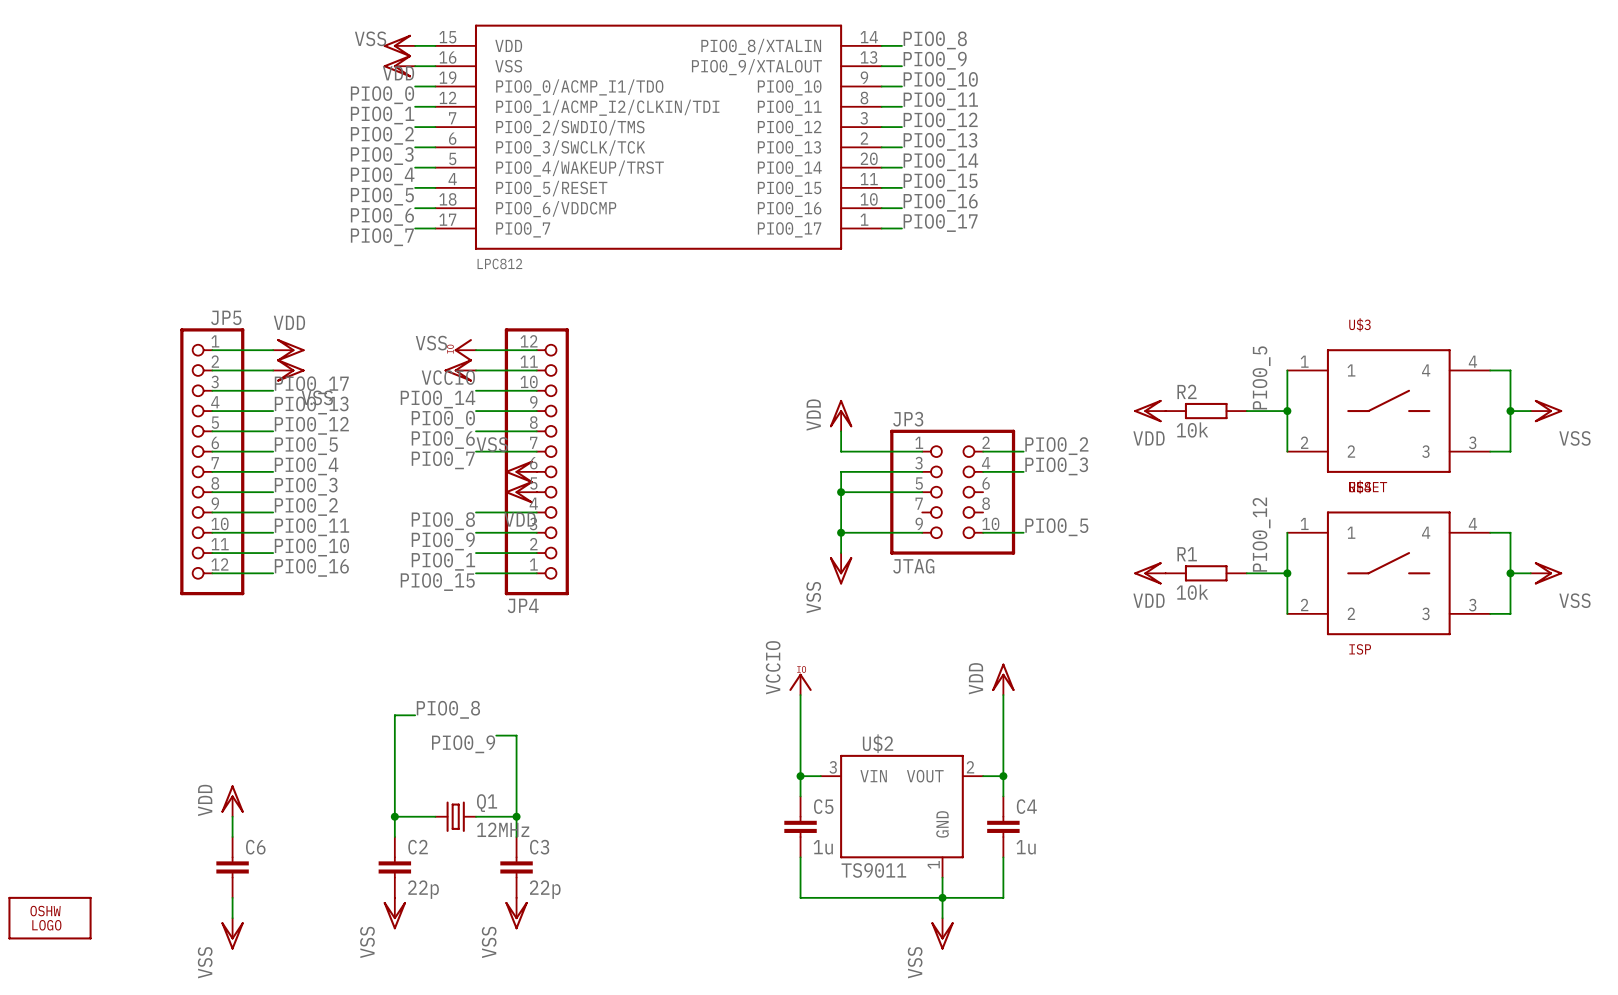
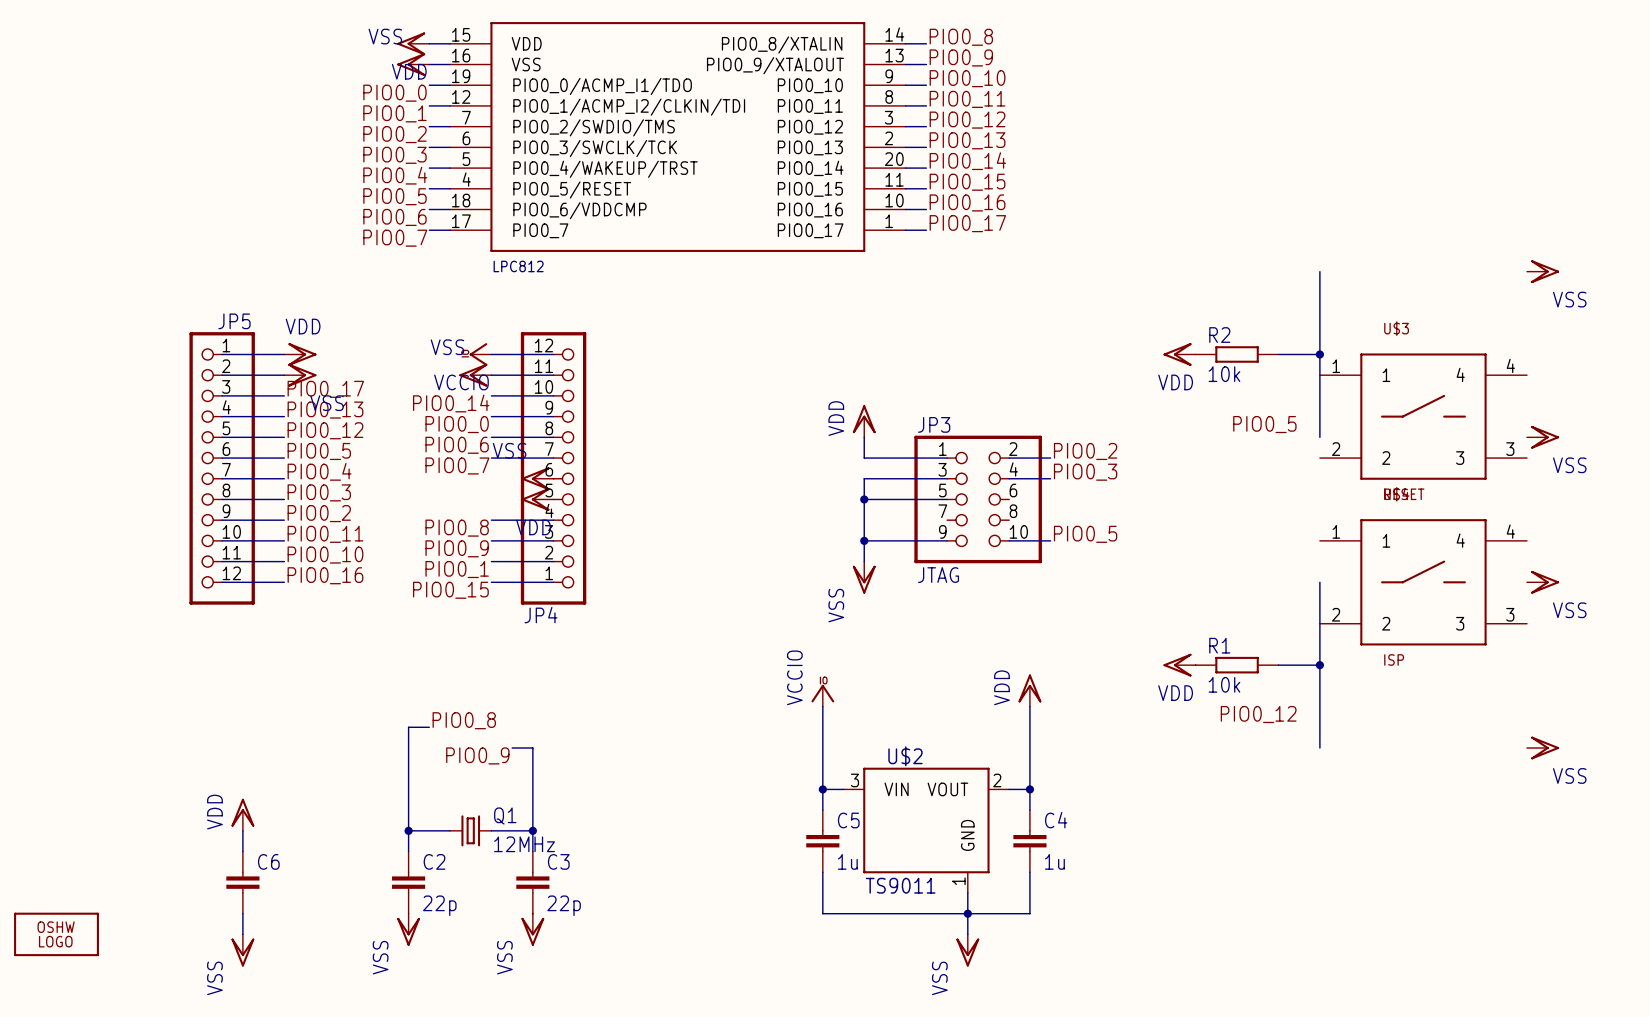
wire: none -> (1319, 271) (1319, 375)
power symbol: none -> VSS (1543, 271)
junction: none -> (1319, 354)
wire: (1490, 370) (1510, 370) (1510, 451) (1490, 451) -> none
label rotation: 0° (1261, 377) -> 90° clockwise (1264, 424)
power symbol position: VDD (1149, 411) -> VDD (1179, 354)
R2 position: (1206, 411) -> (1237, 354)
wire: (1246, 411) (1287, 411) -> (1278, 354) (1319, 354)
junction: (1287, 411) -> none
wire: (1510, 411) (1530, 411) -> none
junction: (1510, 411) -> none
power symbol position: VSS (1546, 411) -> VSS (1543, 437)
wire: (1287, 431) (1287, 451) -> none
wire: (1287, 532) (1287, 573) (1246, 573) -> none
wire: (1490, 532) (1510, 532) (1510, 613) (1490, 613) -> none
label rotation: 0° (1261, 534) -> 90° clockwise (1258, 714)
label position: PIO0_12 (1261, 534) -> PIO0_12 (1258, 714)
power symbol position: VDD (1149, 573) -> VDD (1179, 665)
R1 position: (1206, 573) -> (1237, 665)
junction: (1287, 573) -> none
wire: (1510, 573) (1530, 573) -> none
junction: (1510, 573) -> none
power symbol position: VSS (1546, 573) -> VSS (1543, 582)
wire: none -> (1319, 623) (1319, 748)
wire: none -> (1278, 665) (1319, 665)
junction: none -> (1319, 665)
power symbol: none -> VSS (1543, 748)

